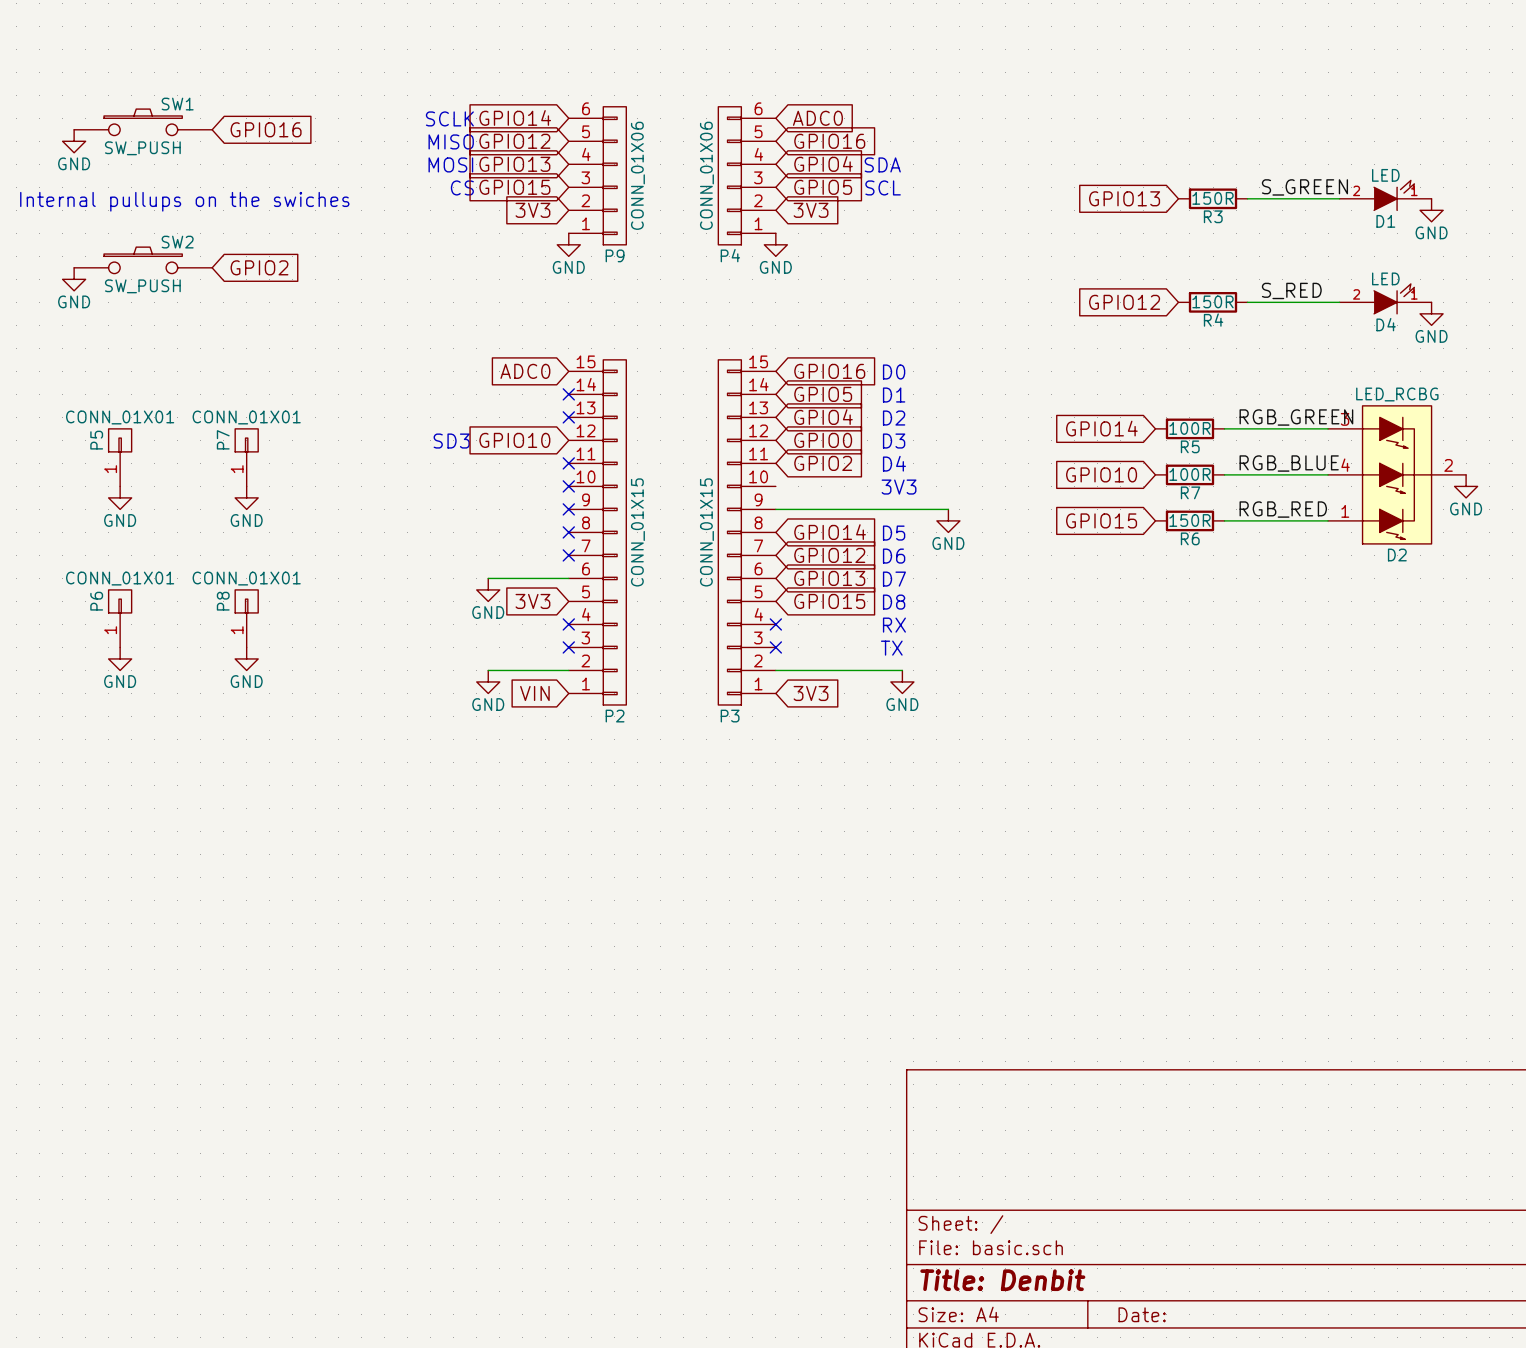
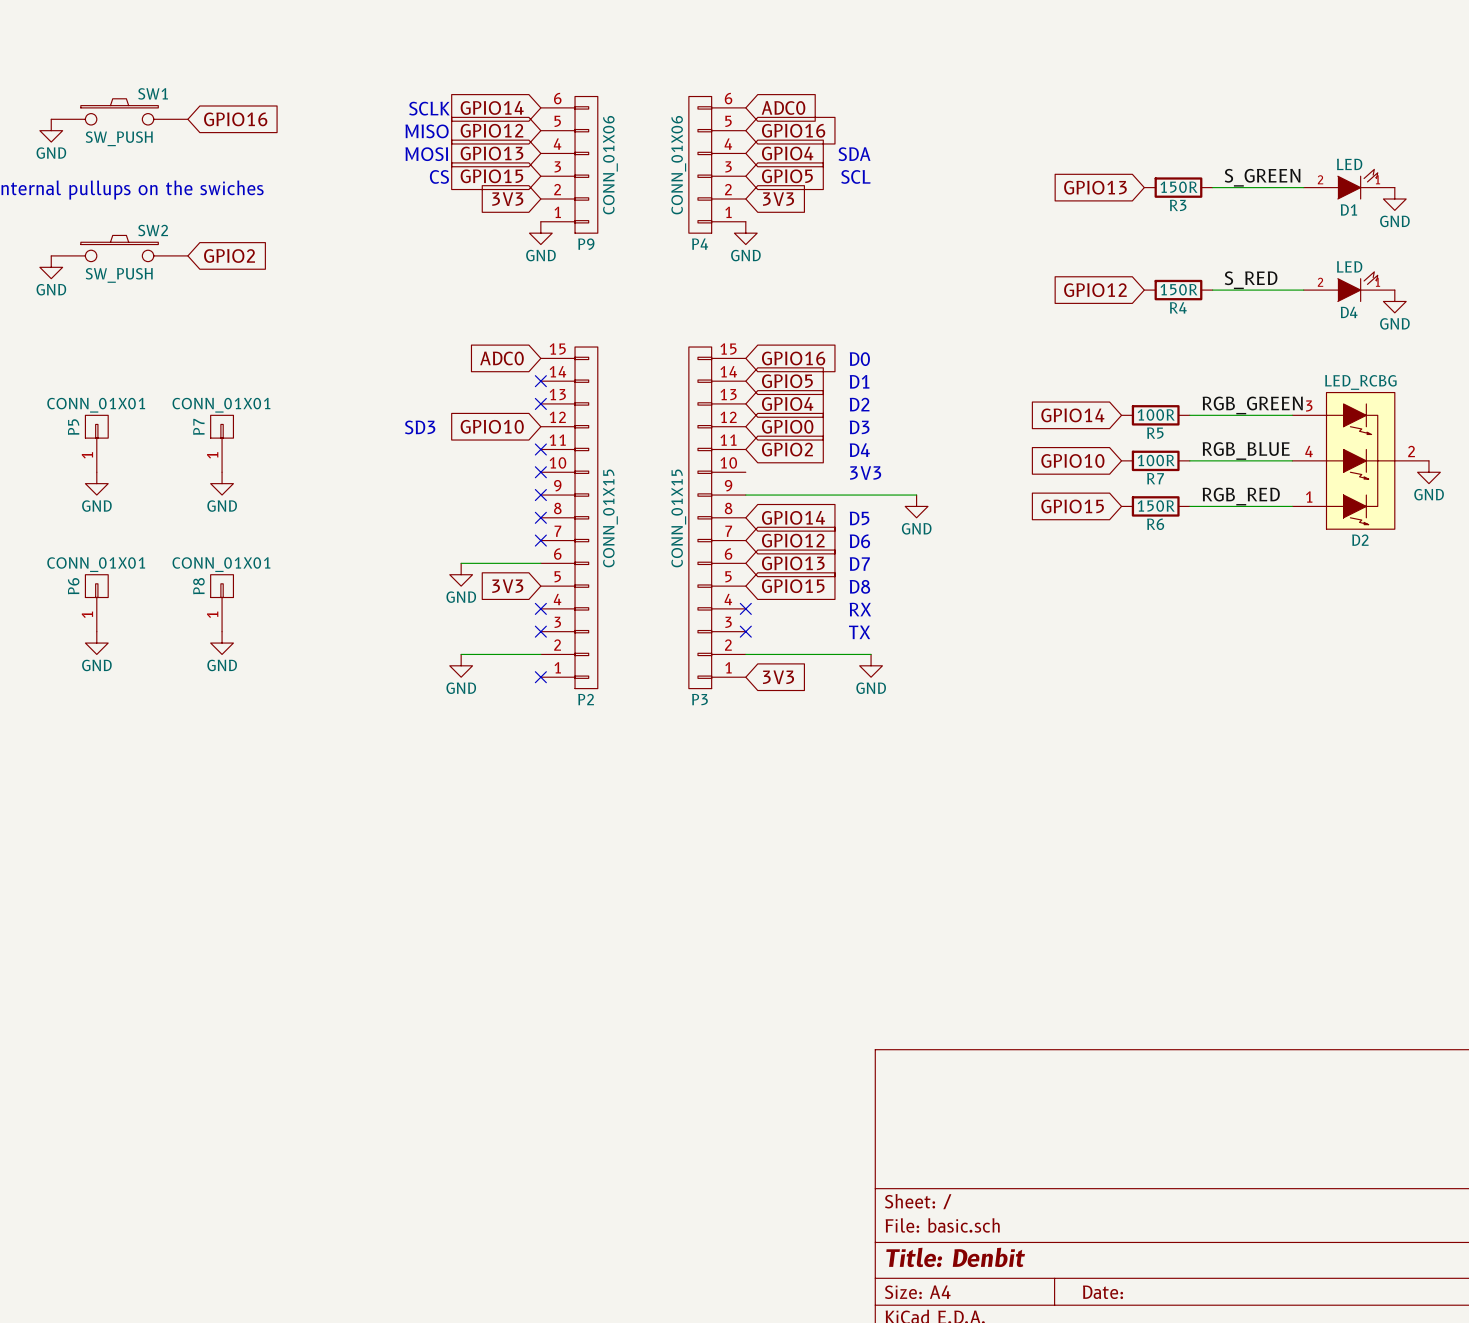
global label: VIN (534, 693) -> none
no-connect mark: none -> (540, 677)

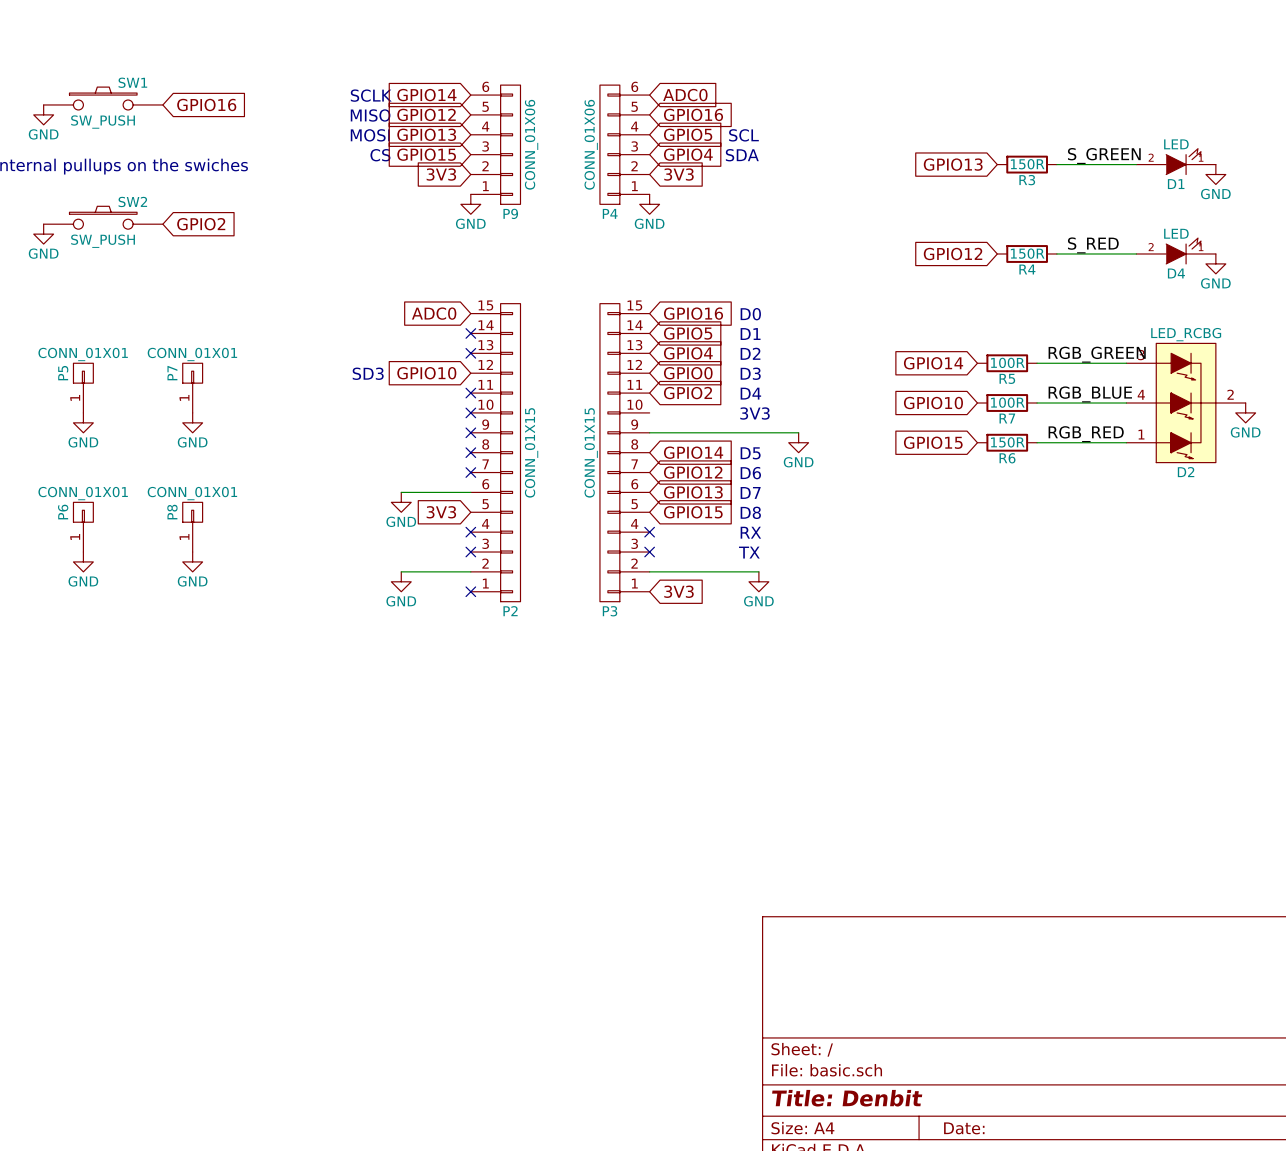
global label: GPIO4 (787, 153) -> GPIO5 (688, 134)
text: SDA (854, 154) -> SCL (743, 135)
global label: GPIO5 (787, 176) -> GPIO4 (688, 154)
text: SCL (855, 176) -> SDA (742, 155)

